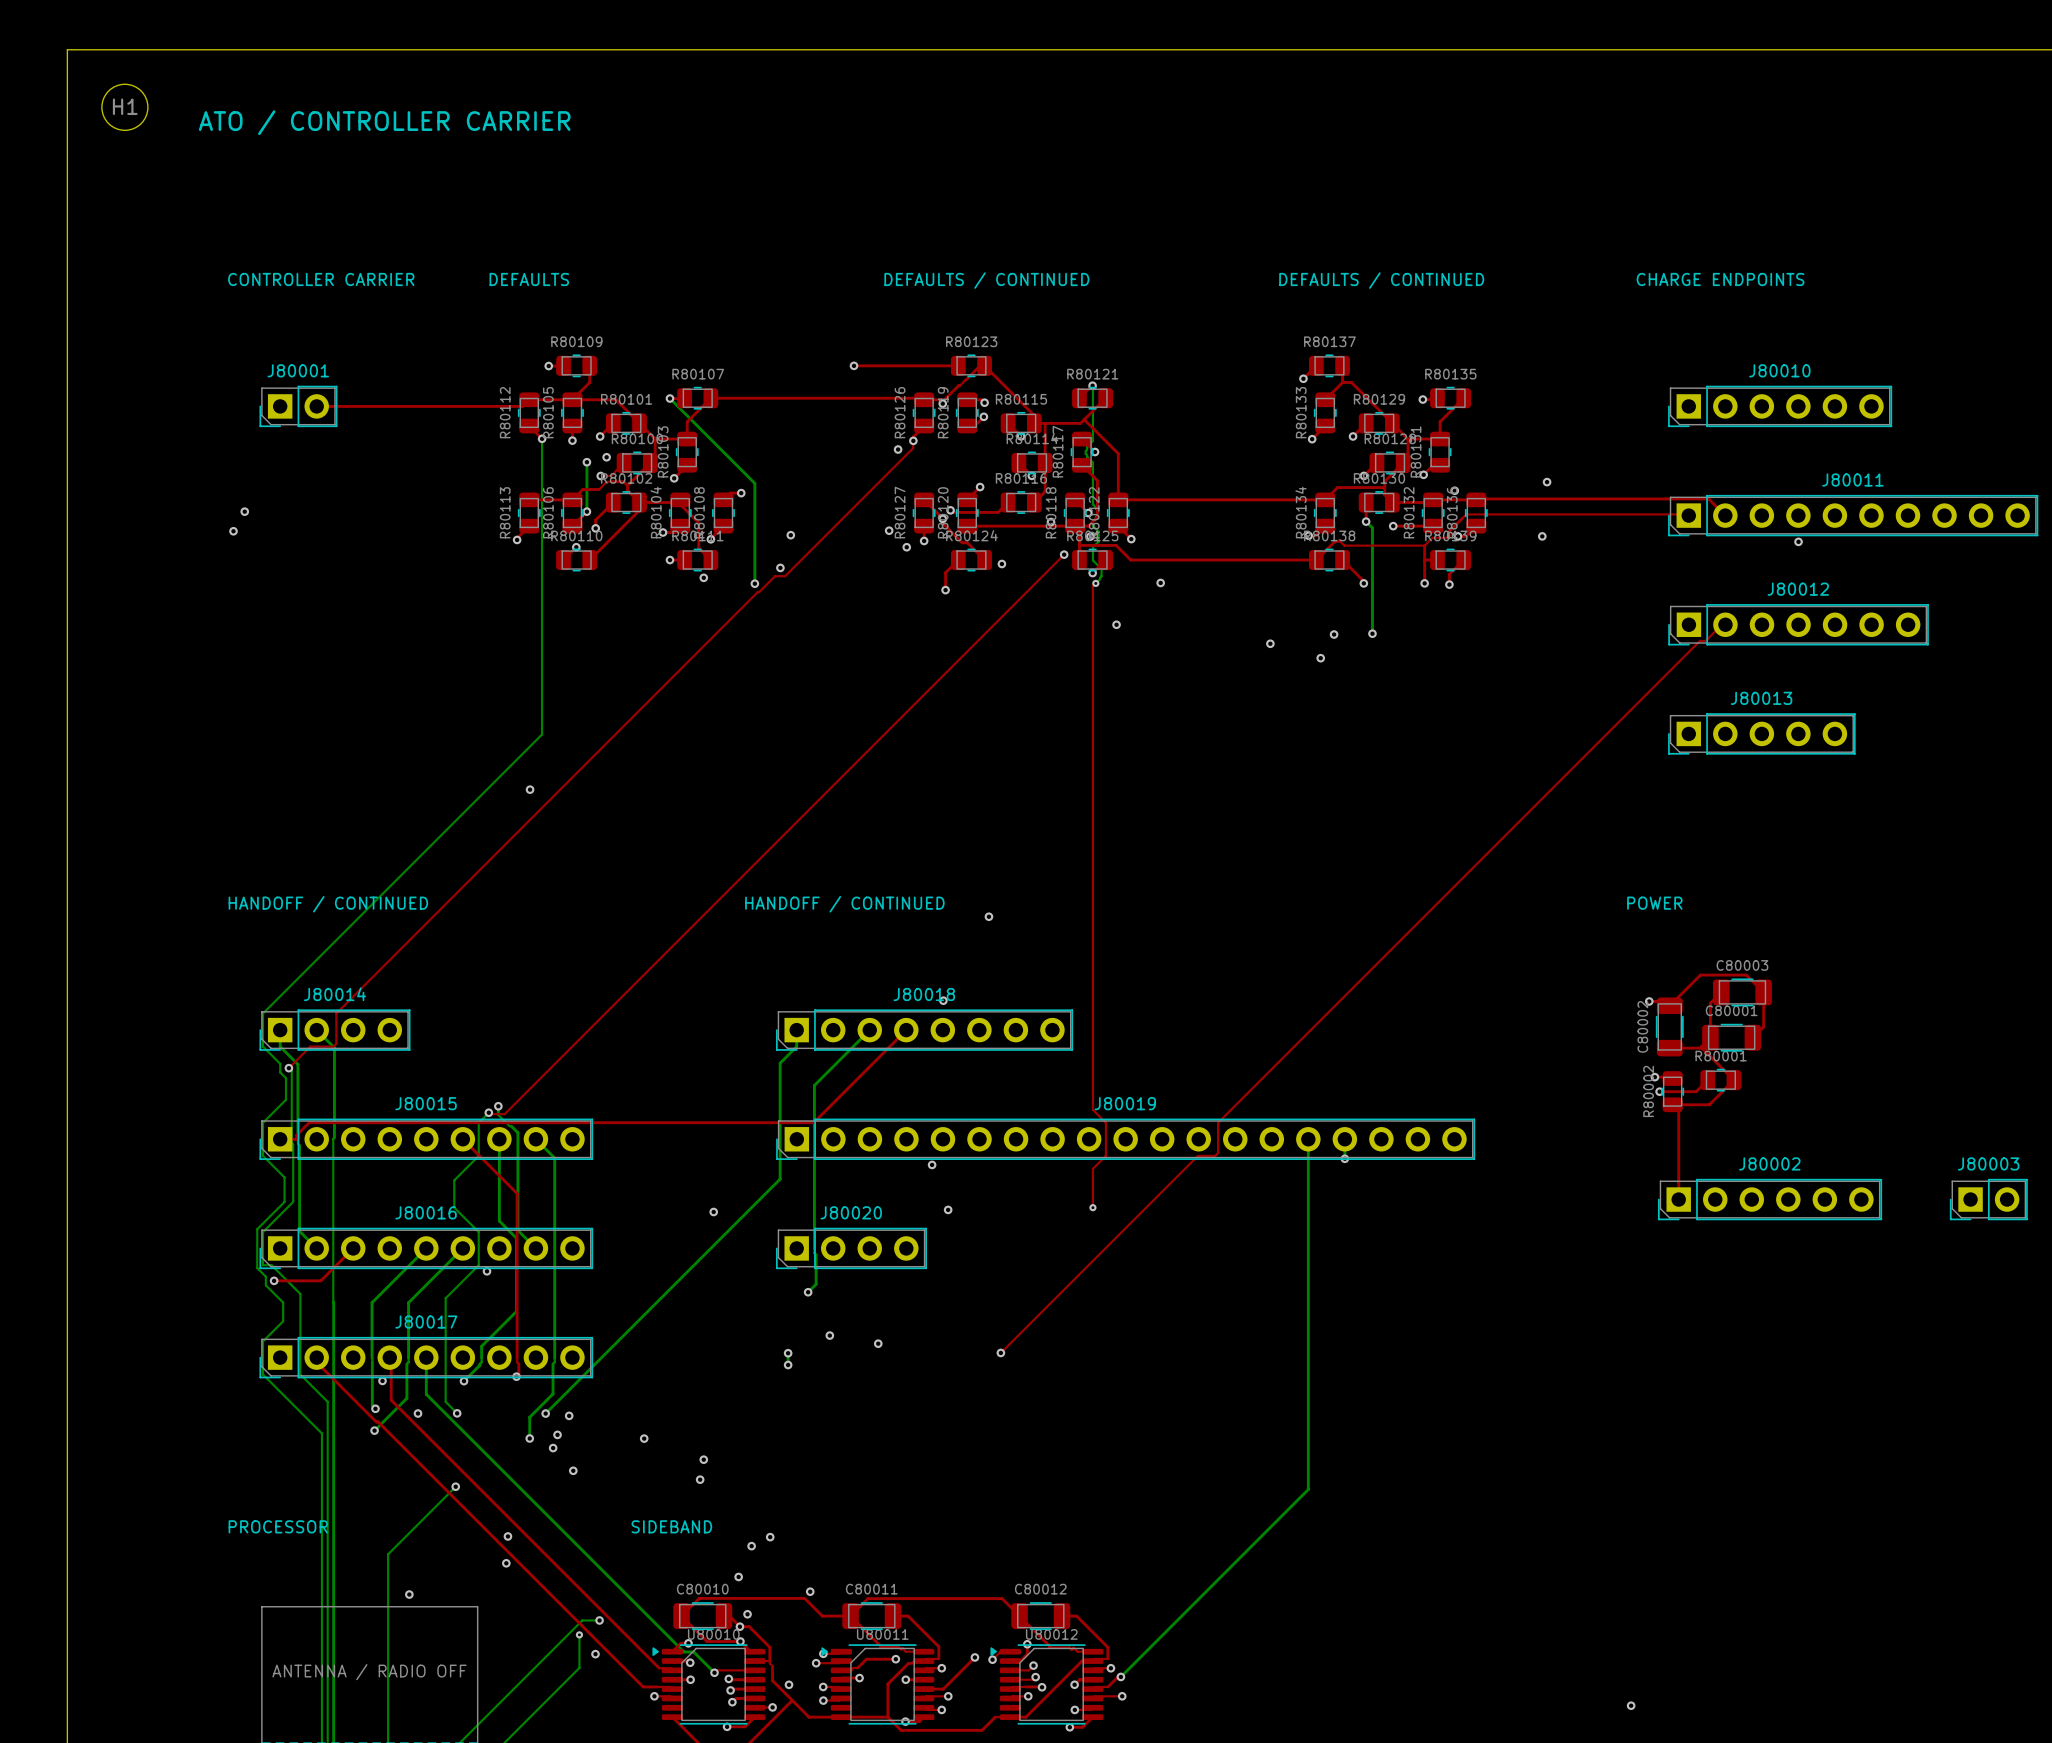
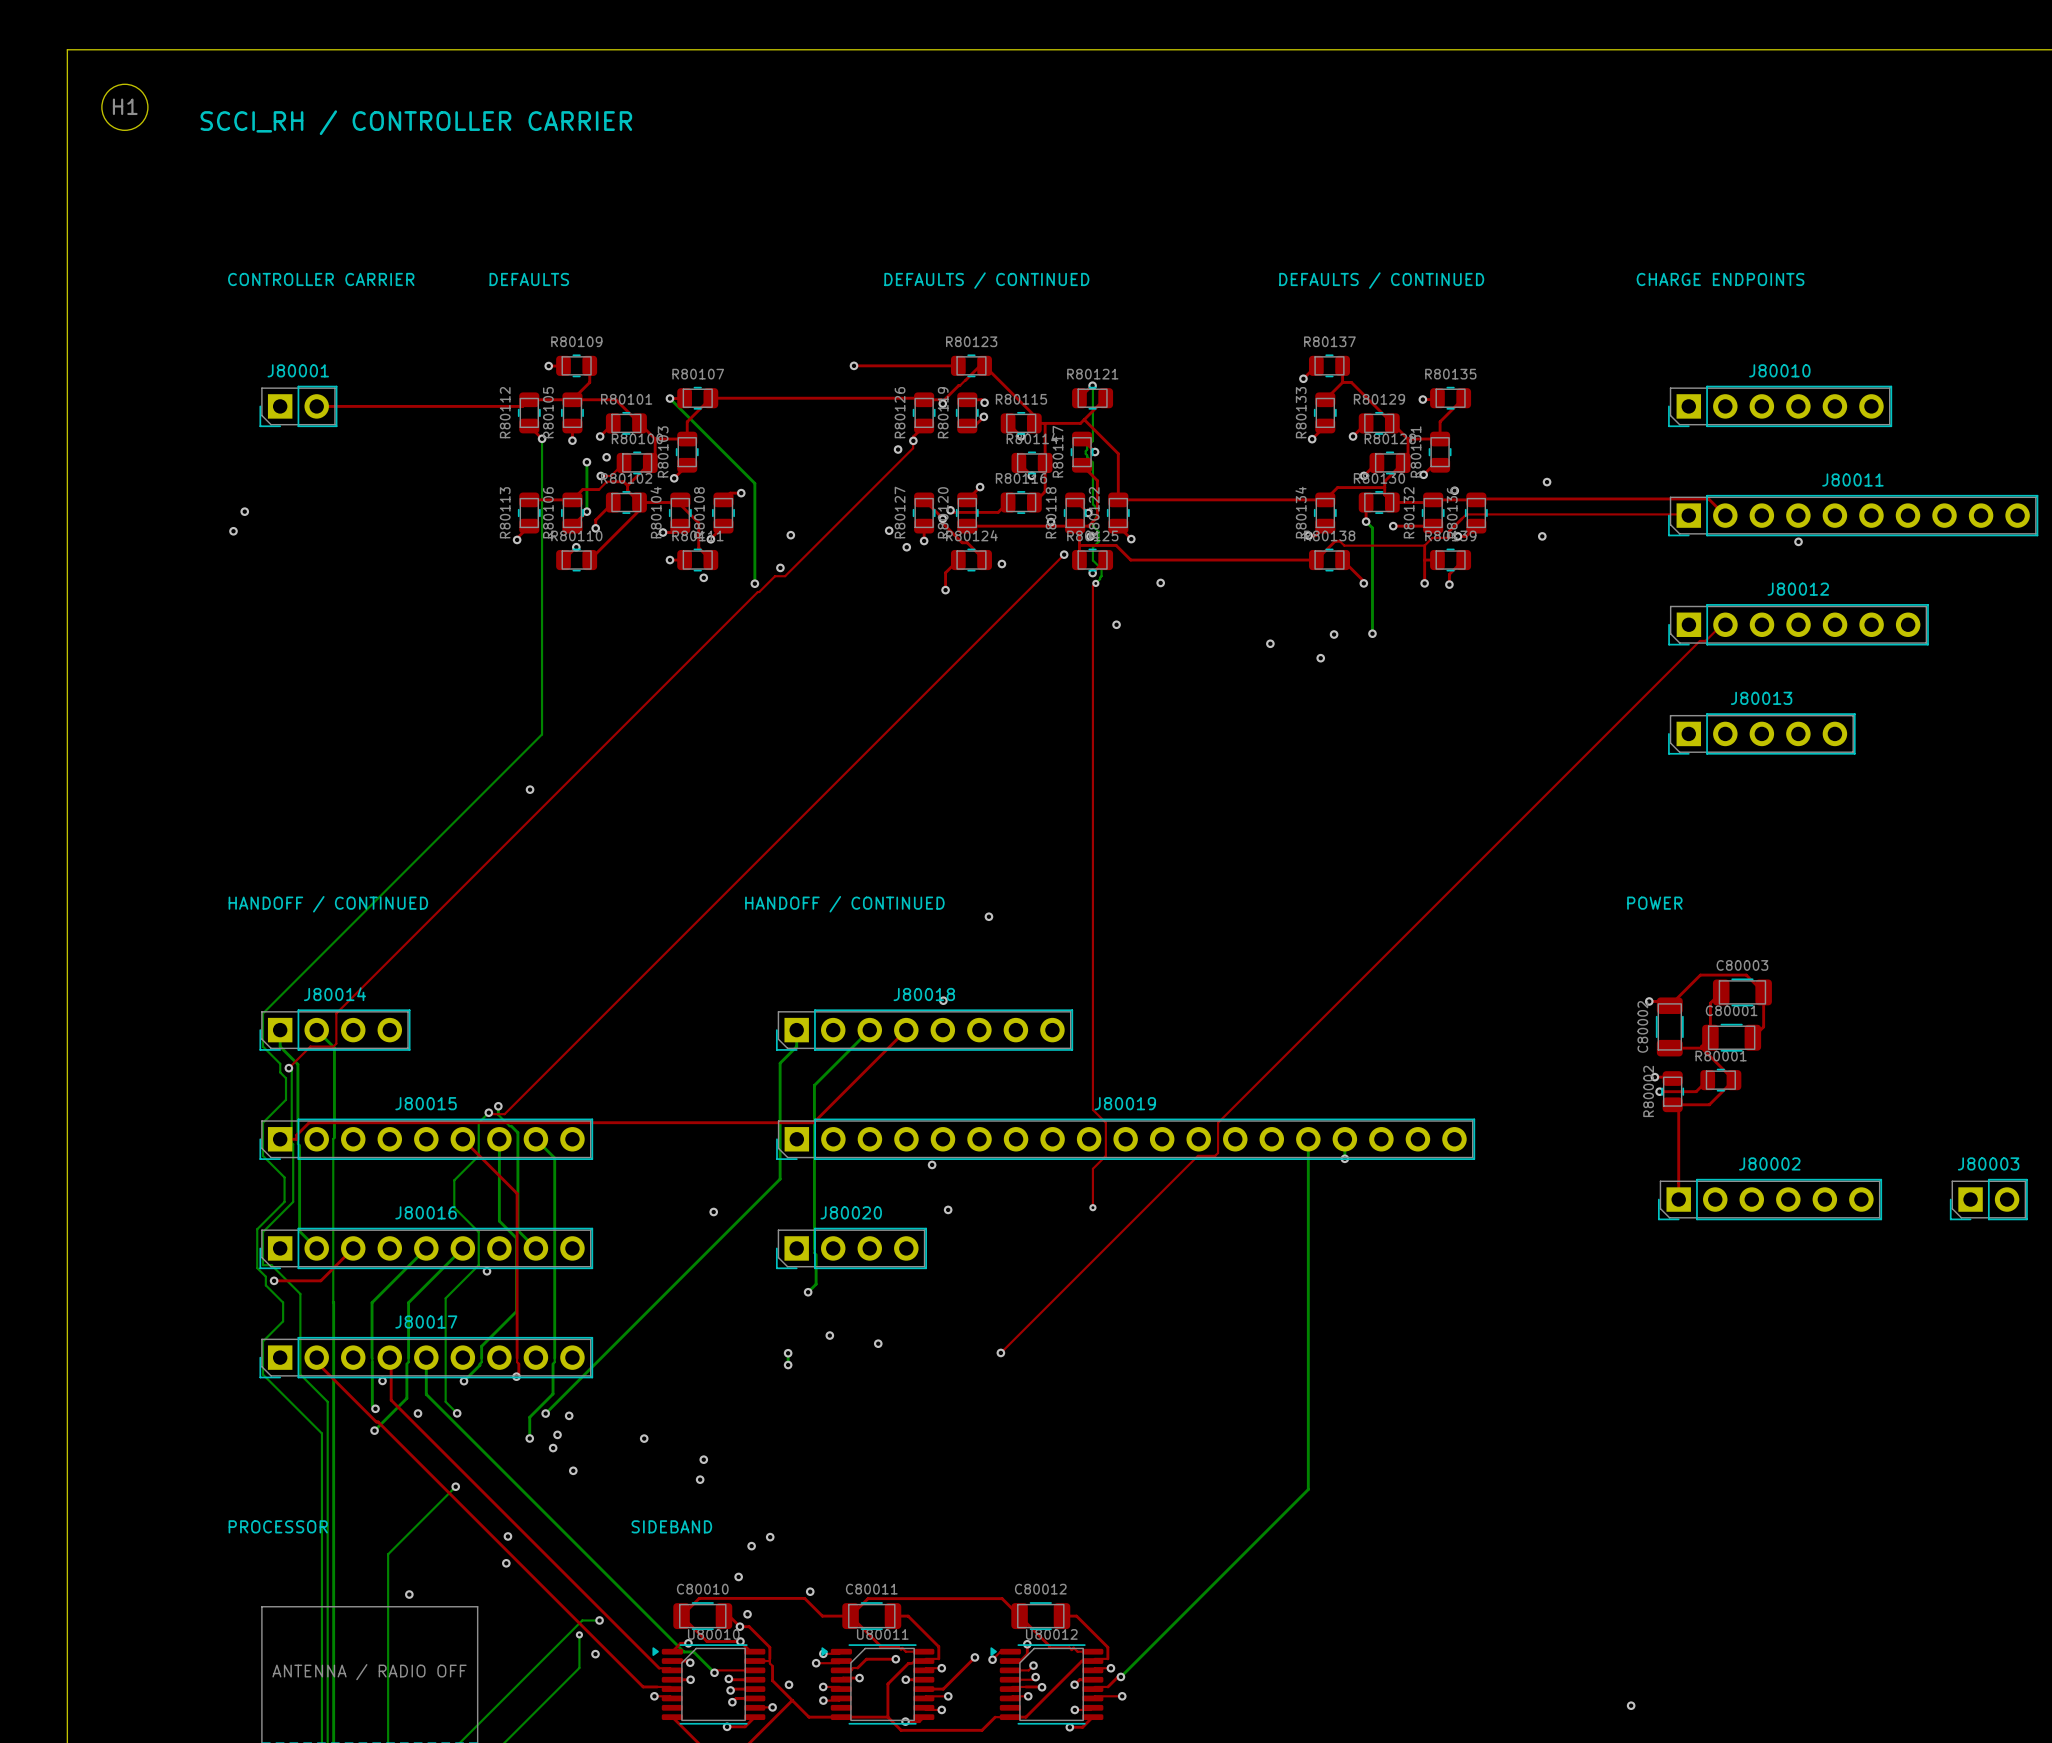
text: ATO / CONTROLLER CARRIER (384, 122) -> SCCI_RH / CONTROLLER CARRIER (416, 122)

